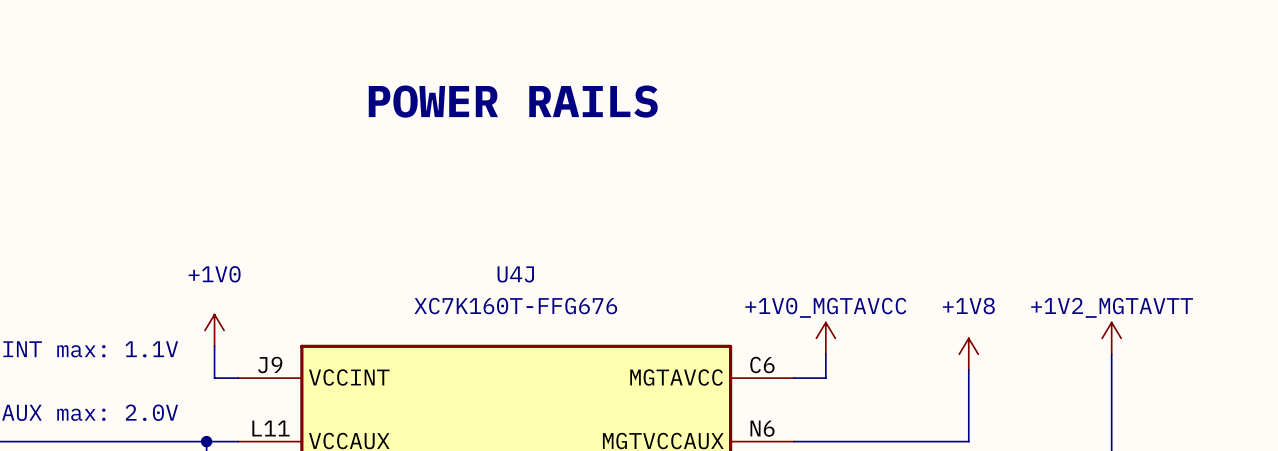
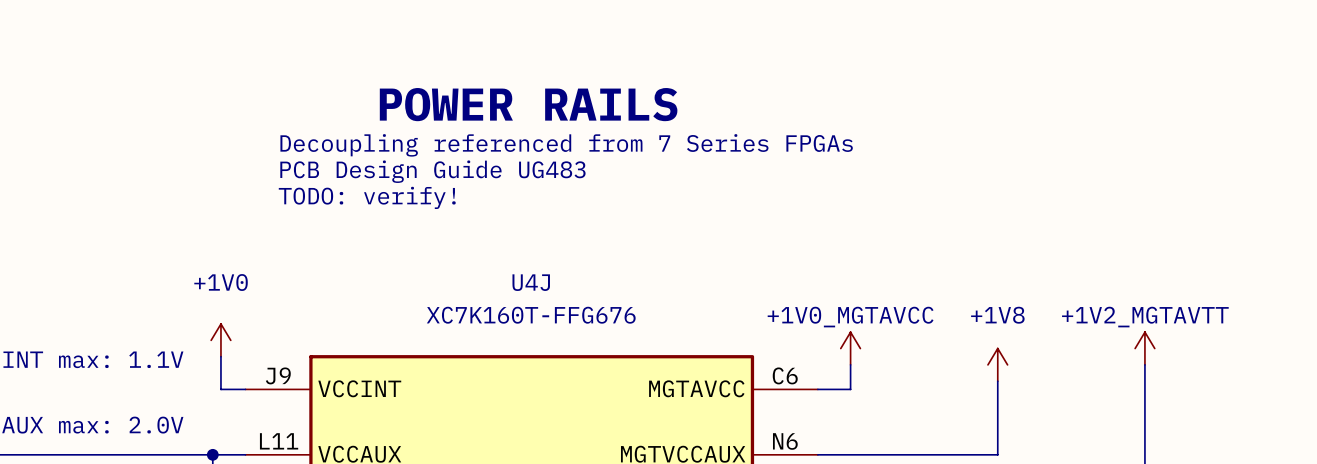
text: none -> Decoupling referenced from 7 Series FPGAs (566, 145)
text: none -> PCB Design Guide UG483 (432, 171)
text: none -> TODO: verify! (367, 197)

